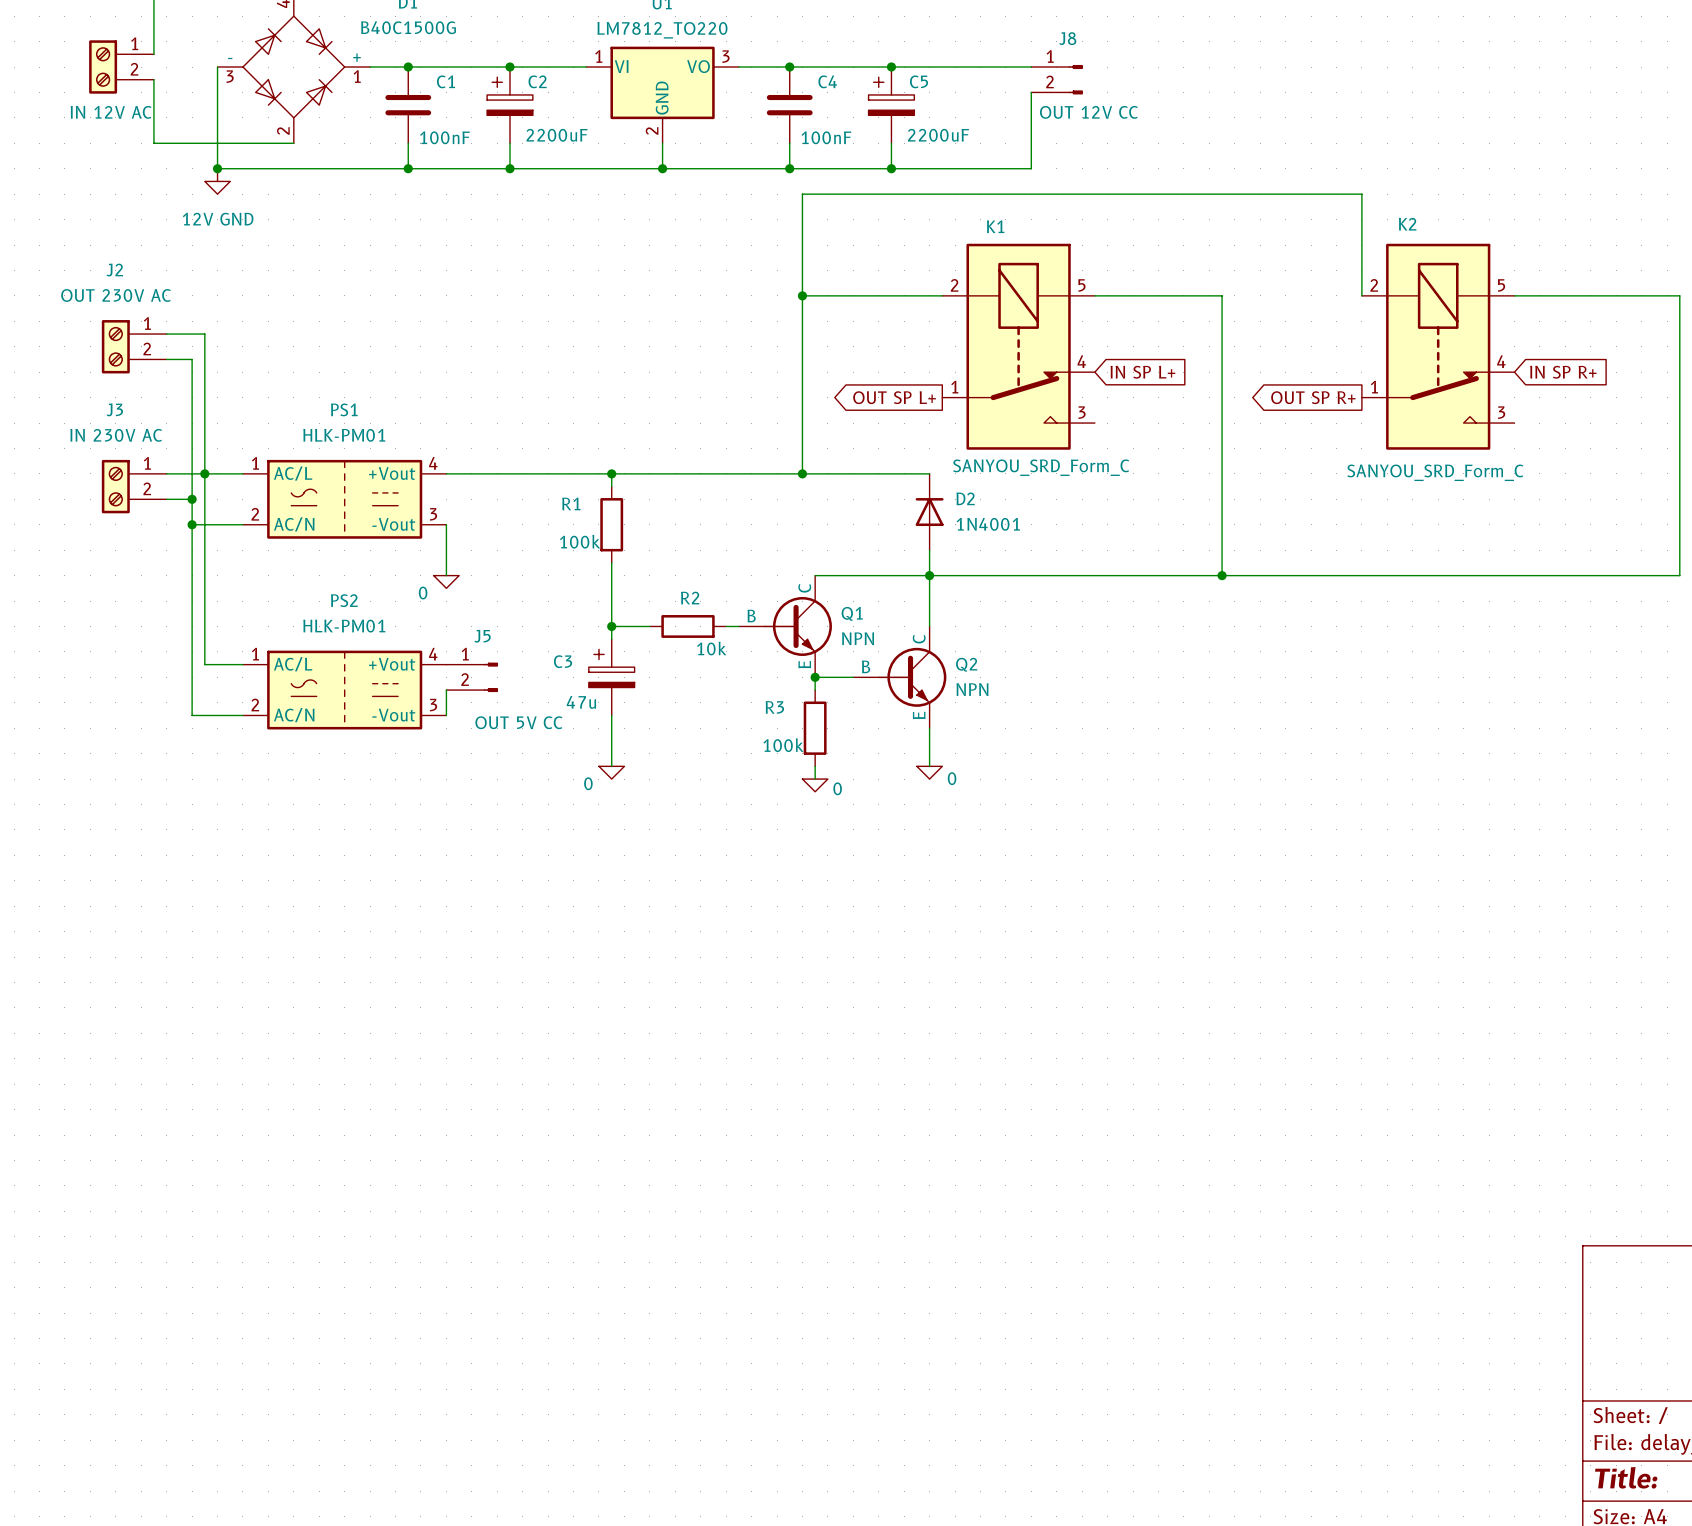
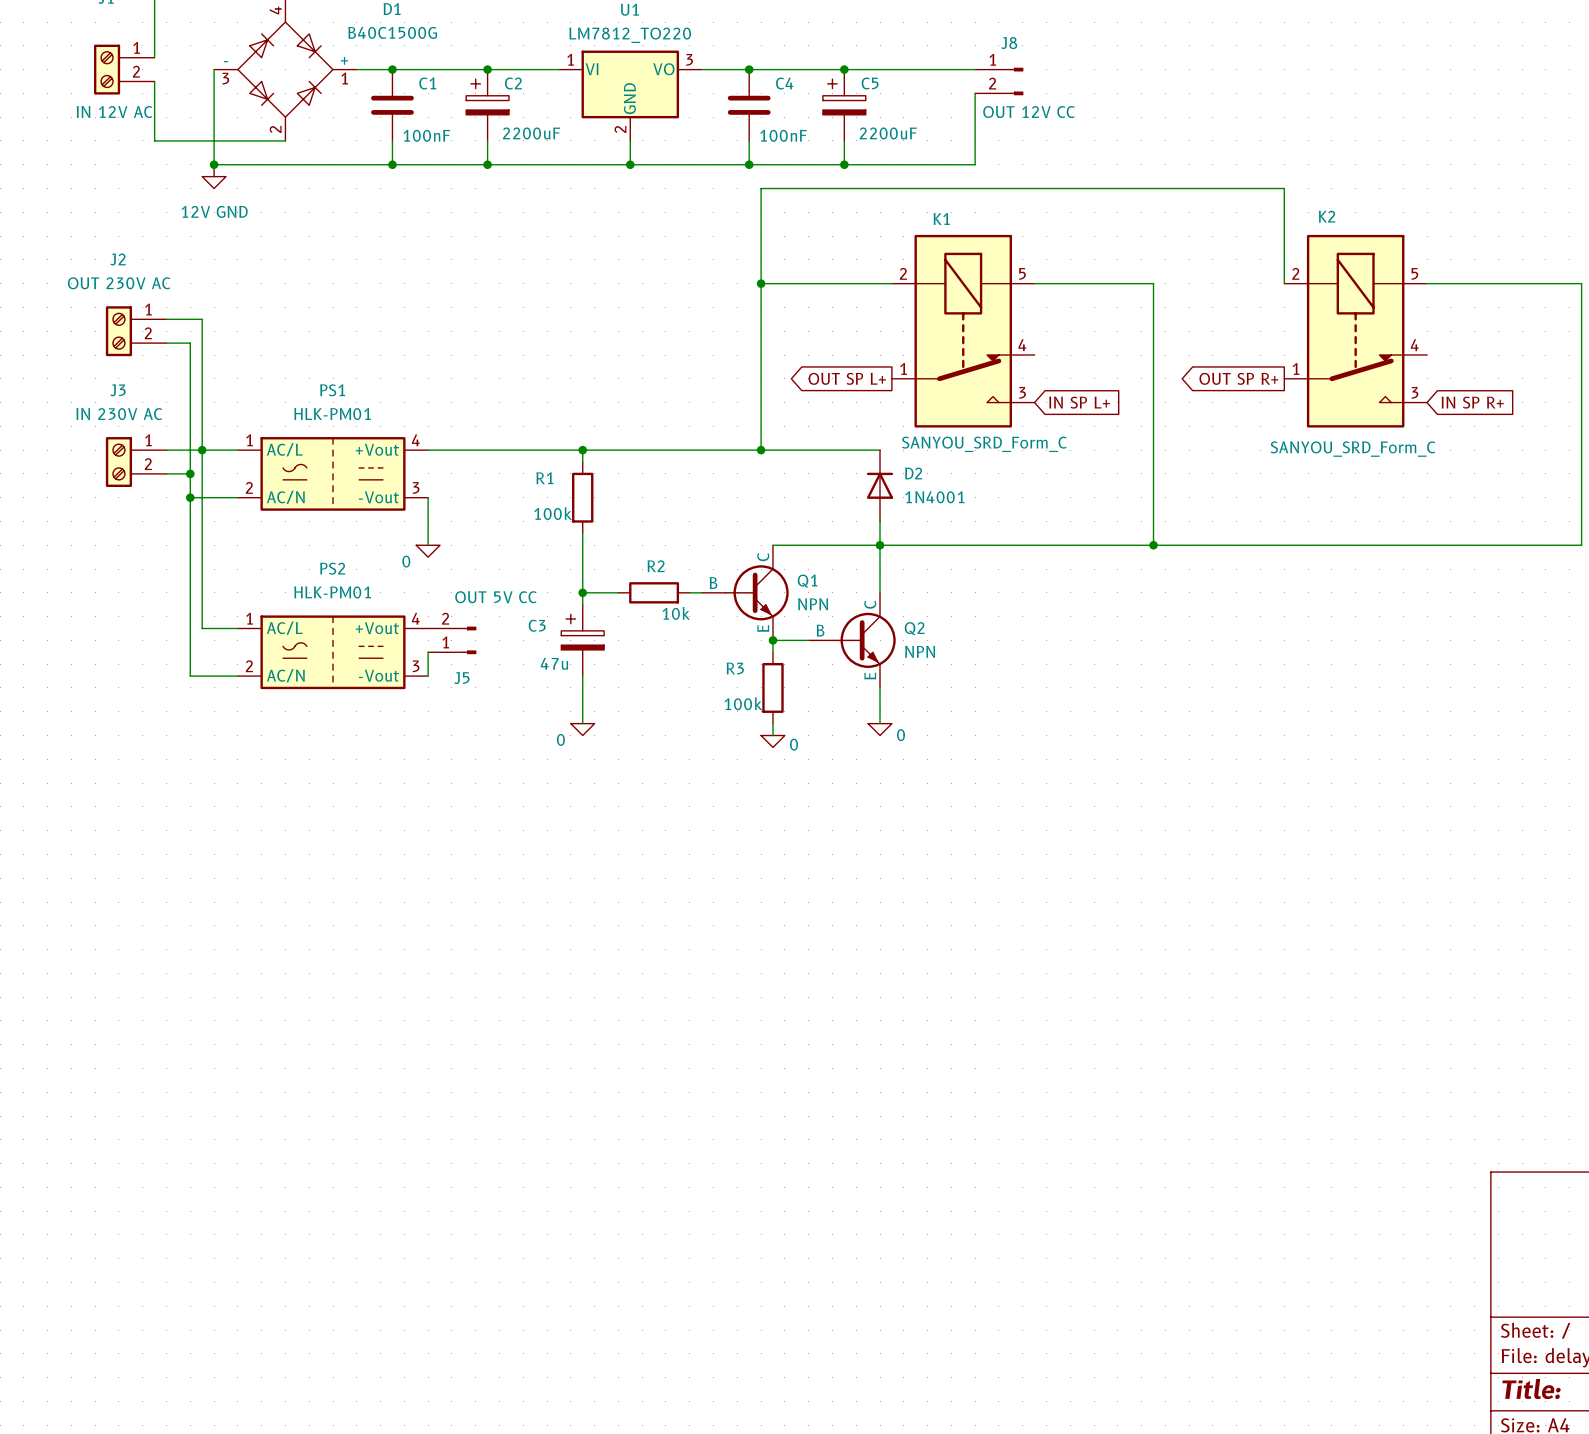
global label position: IN SP L+ (1142, 372) -> IN SP L+ (1079, 402)
global label position: IN SP R+ (1563, 372) -> IN SP R+ (1472, 402)
J5 flip: as is (490, 677) -> up-down (469, 640)

